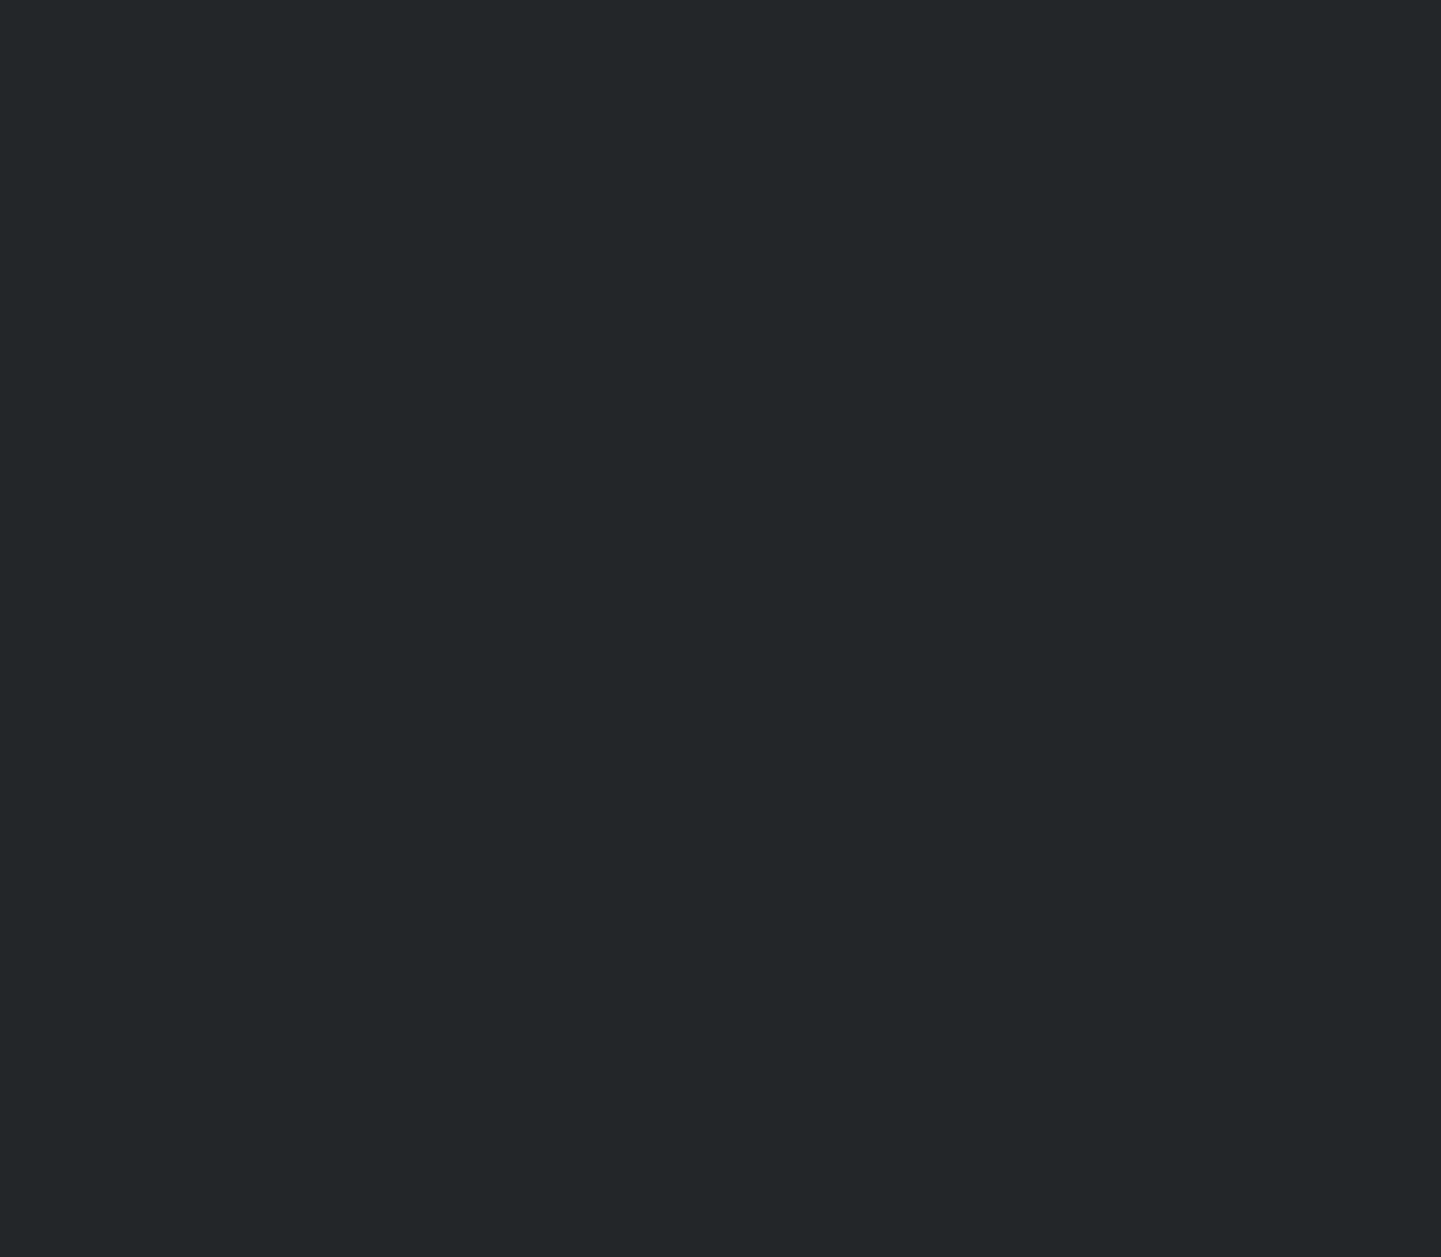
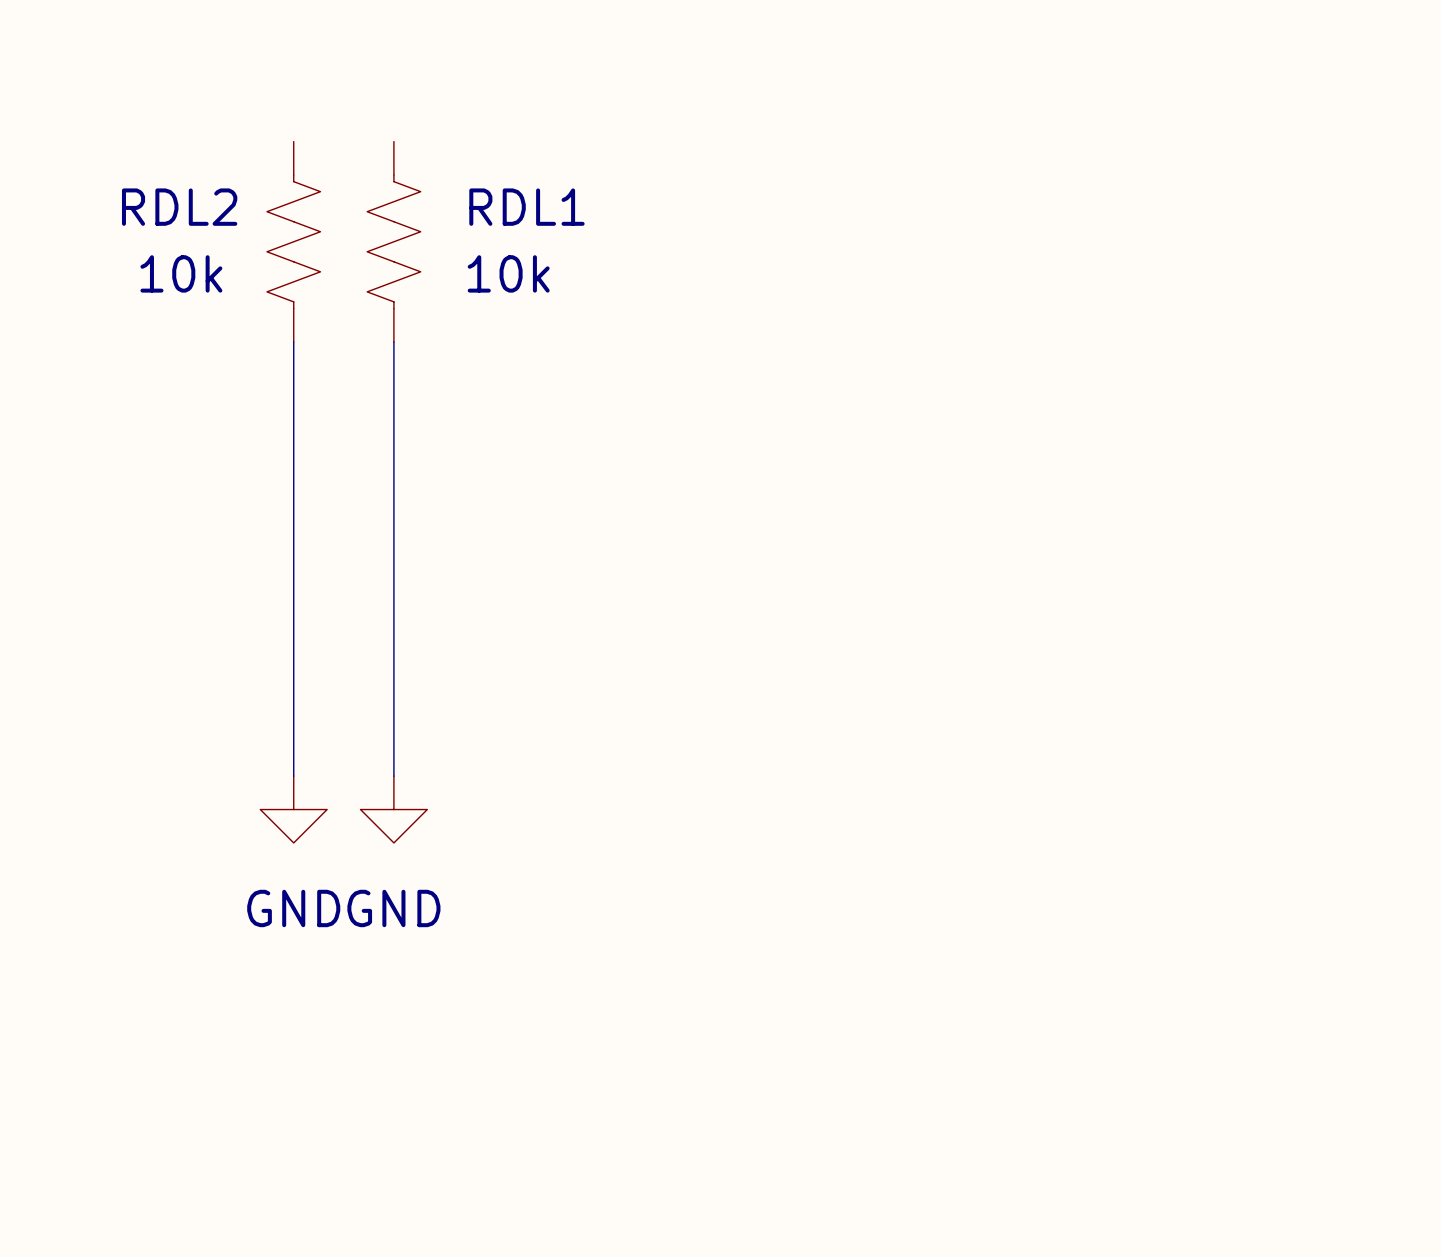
RDL2: none -> 10k (293, 241)
RDL1: none -> 10k (393, 241)
wire: none -> (293, 341) (293, 776)
wire: none -> (393, 341) (393, 776)
power symbol: none -> GND (293, 809)
power symbol: none -> GND (393, 809)

